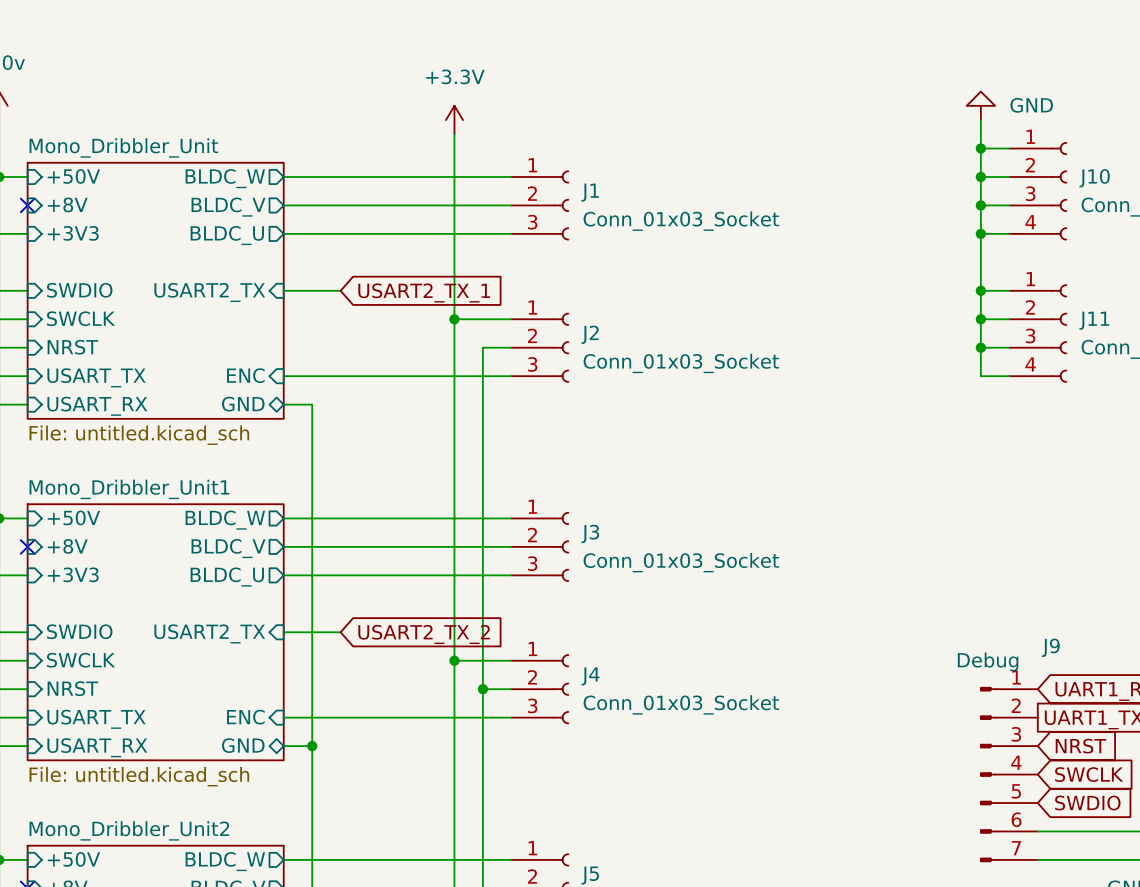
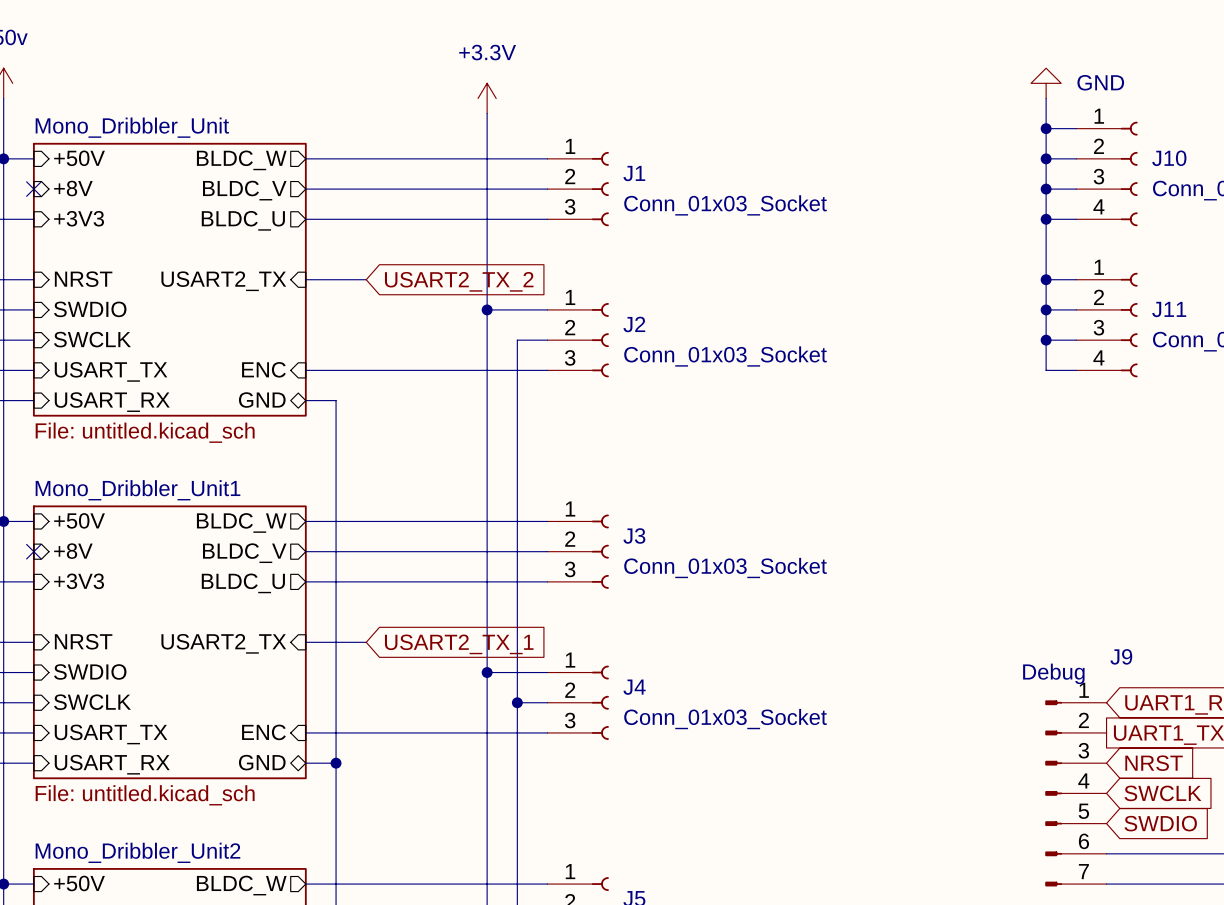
sheet pin: SWDIO (79, 290) -> NRST (83, 279)
global label: USART2_TX_1 (424, 292) -> USART2_TX_2 (459, 281)
sheet pin: SWCLK (81, 318) -> SWDIO (90, 309)
sheet pin: NRST (72, 347) -> SWCLK (92, 339)
sheet pin: SWDIO (79, 631) -> NRST (83, 641)
global label: USART2_TX_2 (424, 634) -> USART2_TX_1 (459, 644)
sheet pin: SWCLK (81, 660) -> SWDIO (90, 671)
sheet pin: NRST (72, 688) -> SWCLK (92, 702)

